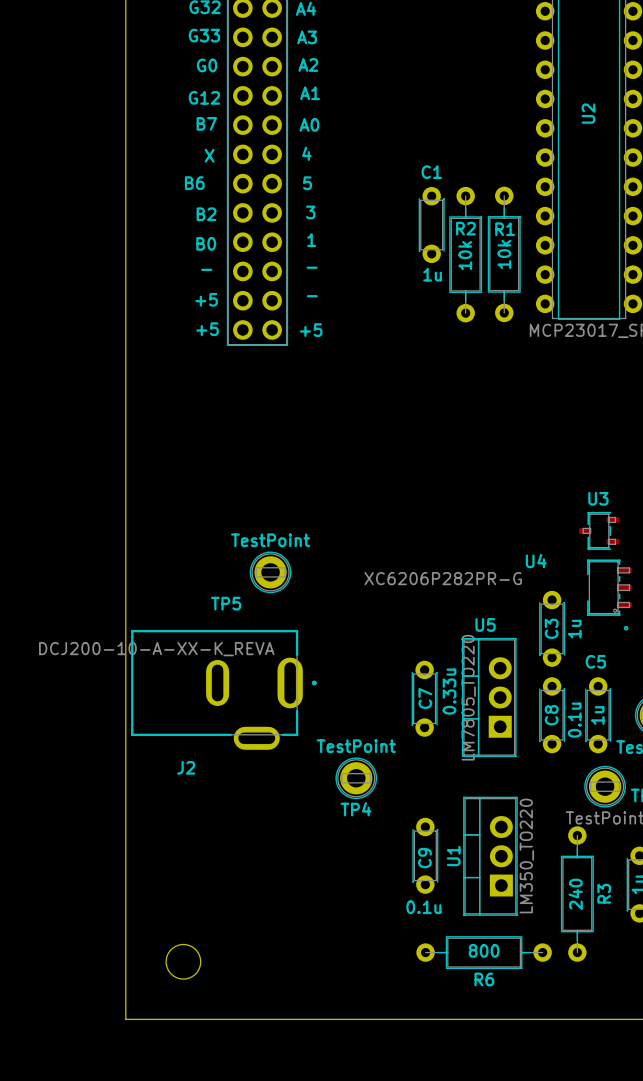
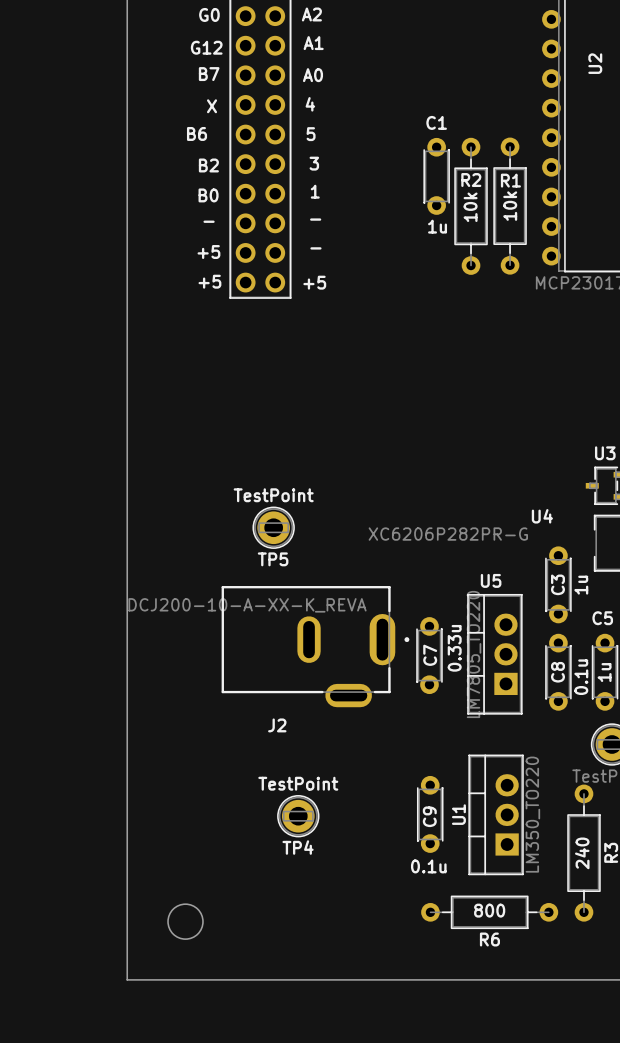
TP5 name position: TP5 (226, 603) -> TP5 (273, 559)
J2 position: (223, 689) -> (315, 646)
TP4 position: (356, 778) -> (298, 816)

